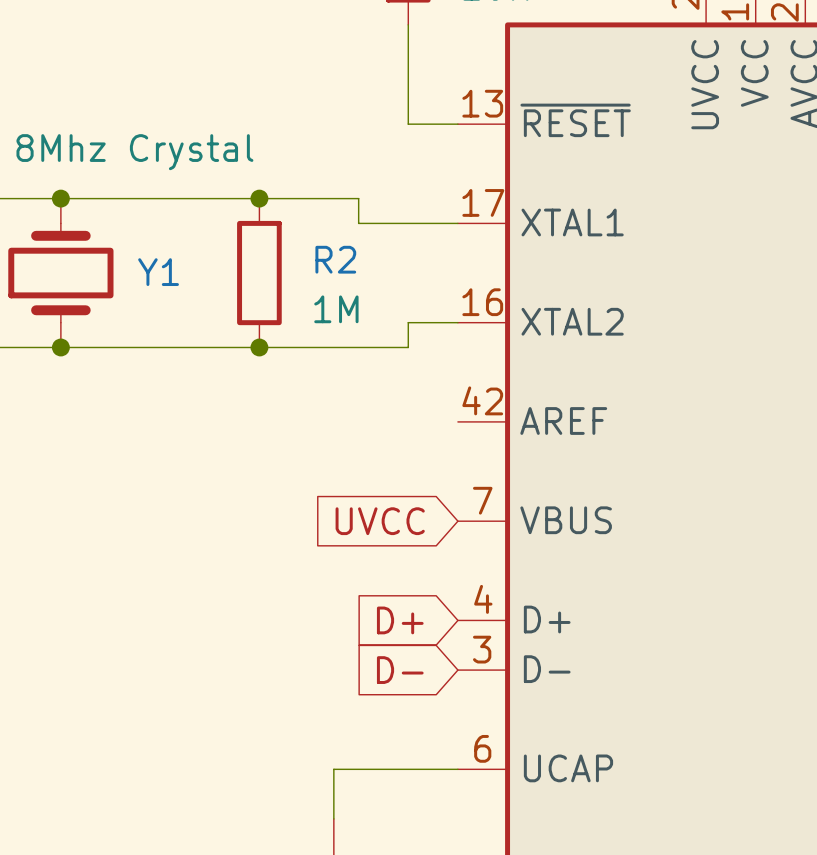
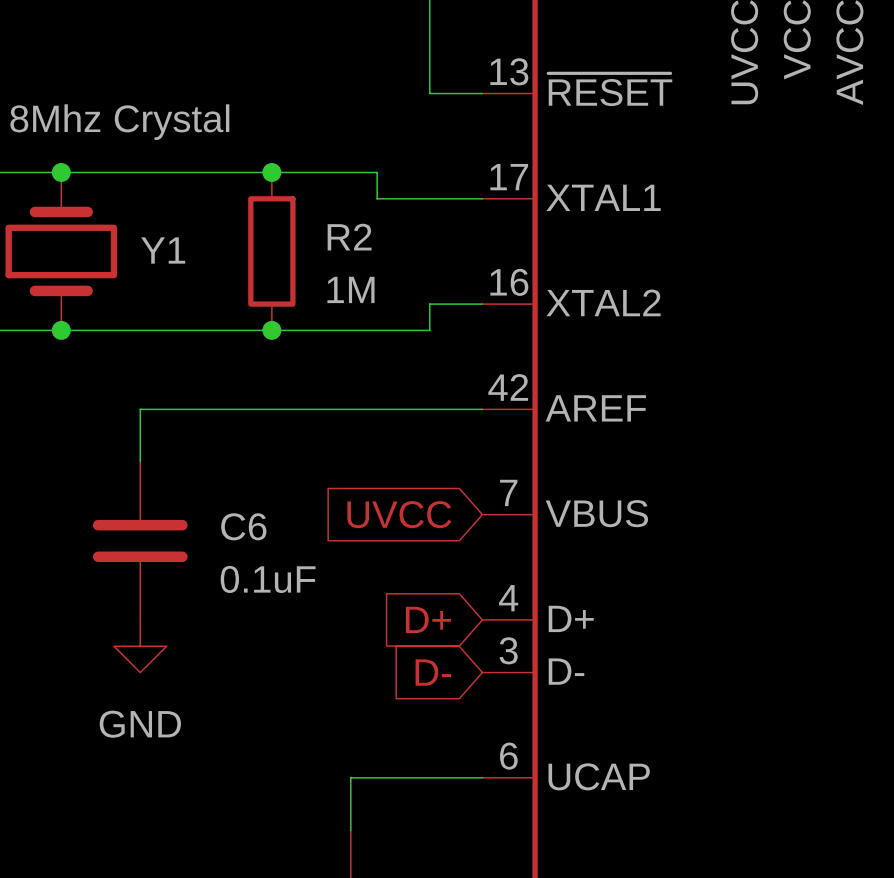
wire: none -> (482, 409) (140, 409) (140, 462)
C6: none -> 0.1uF (140, 540)
power symbol: none -> GND (140, 646)

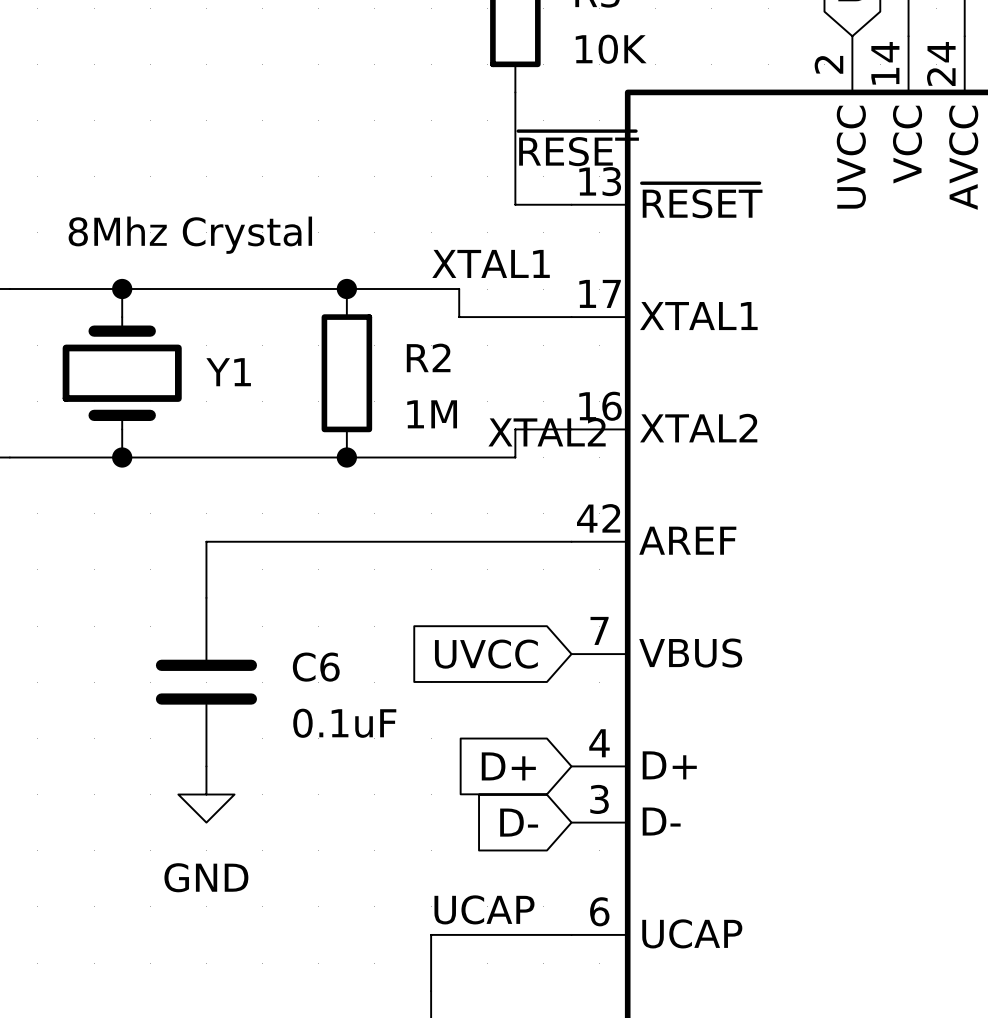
label: none -> ~{RESET} (578, 148)
label: none -> XTAL1 (491, 263)
label: none -> XTAL2 (547, 432)
label: none -> UCAP (484, 909)

